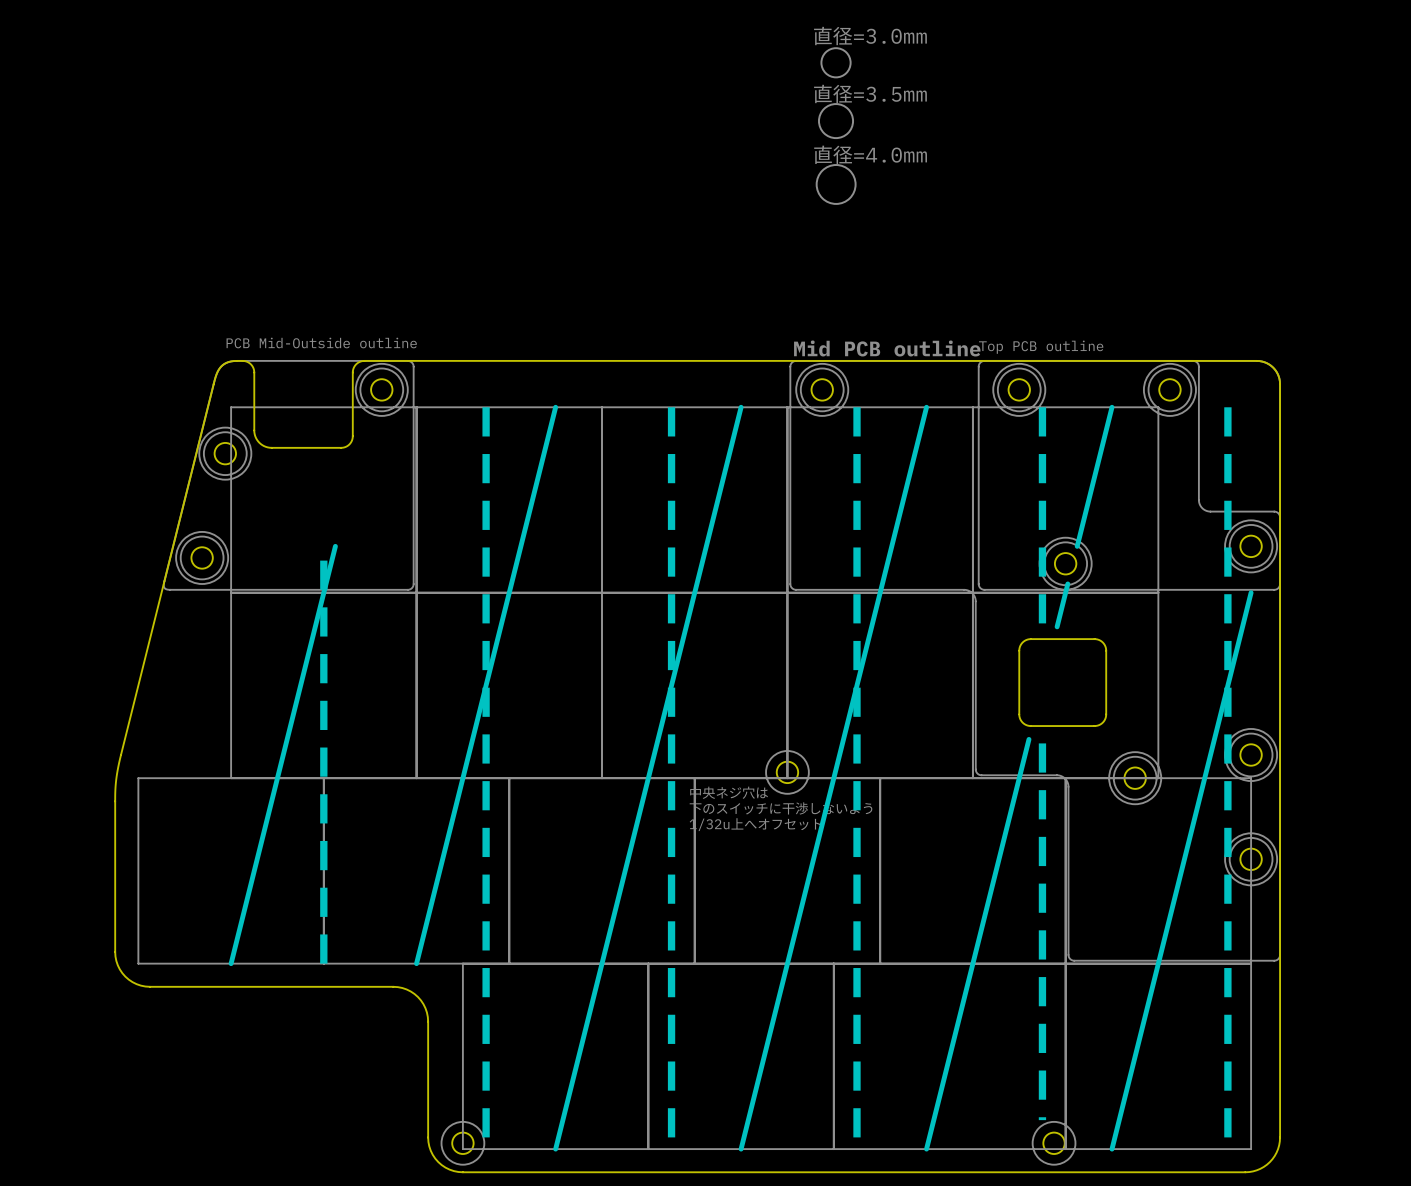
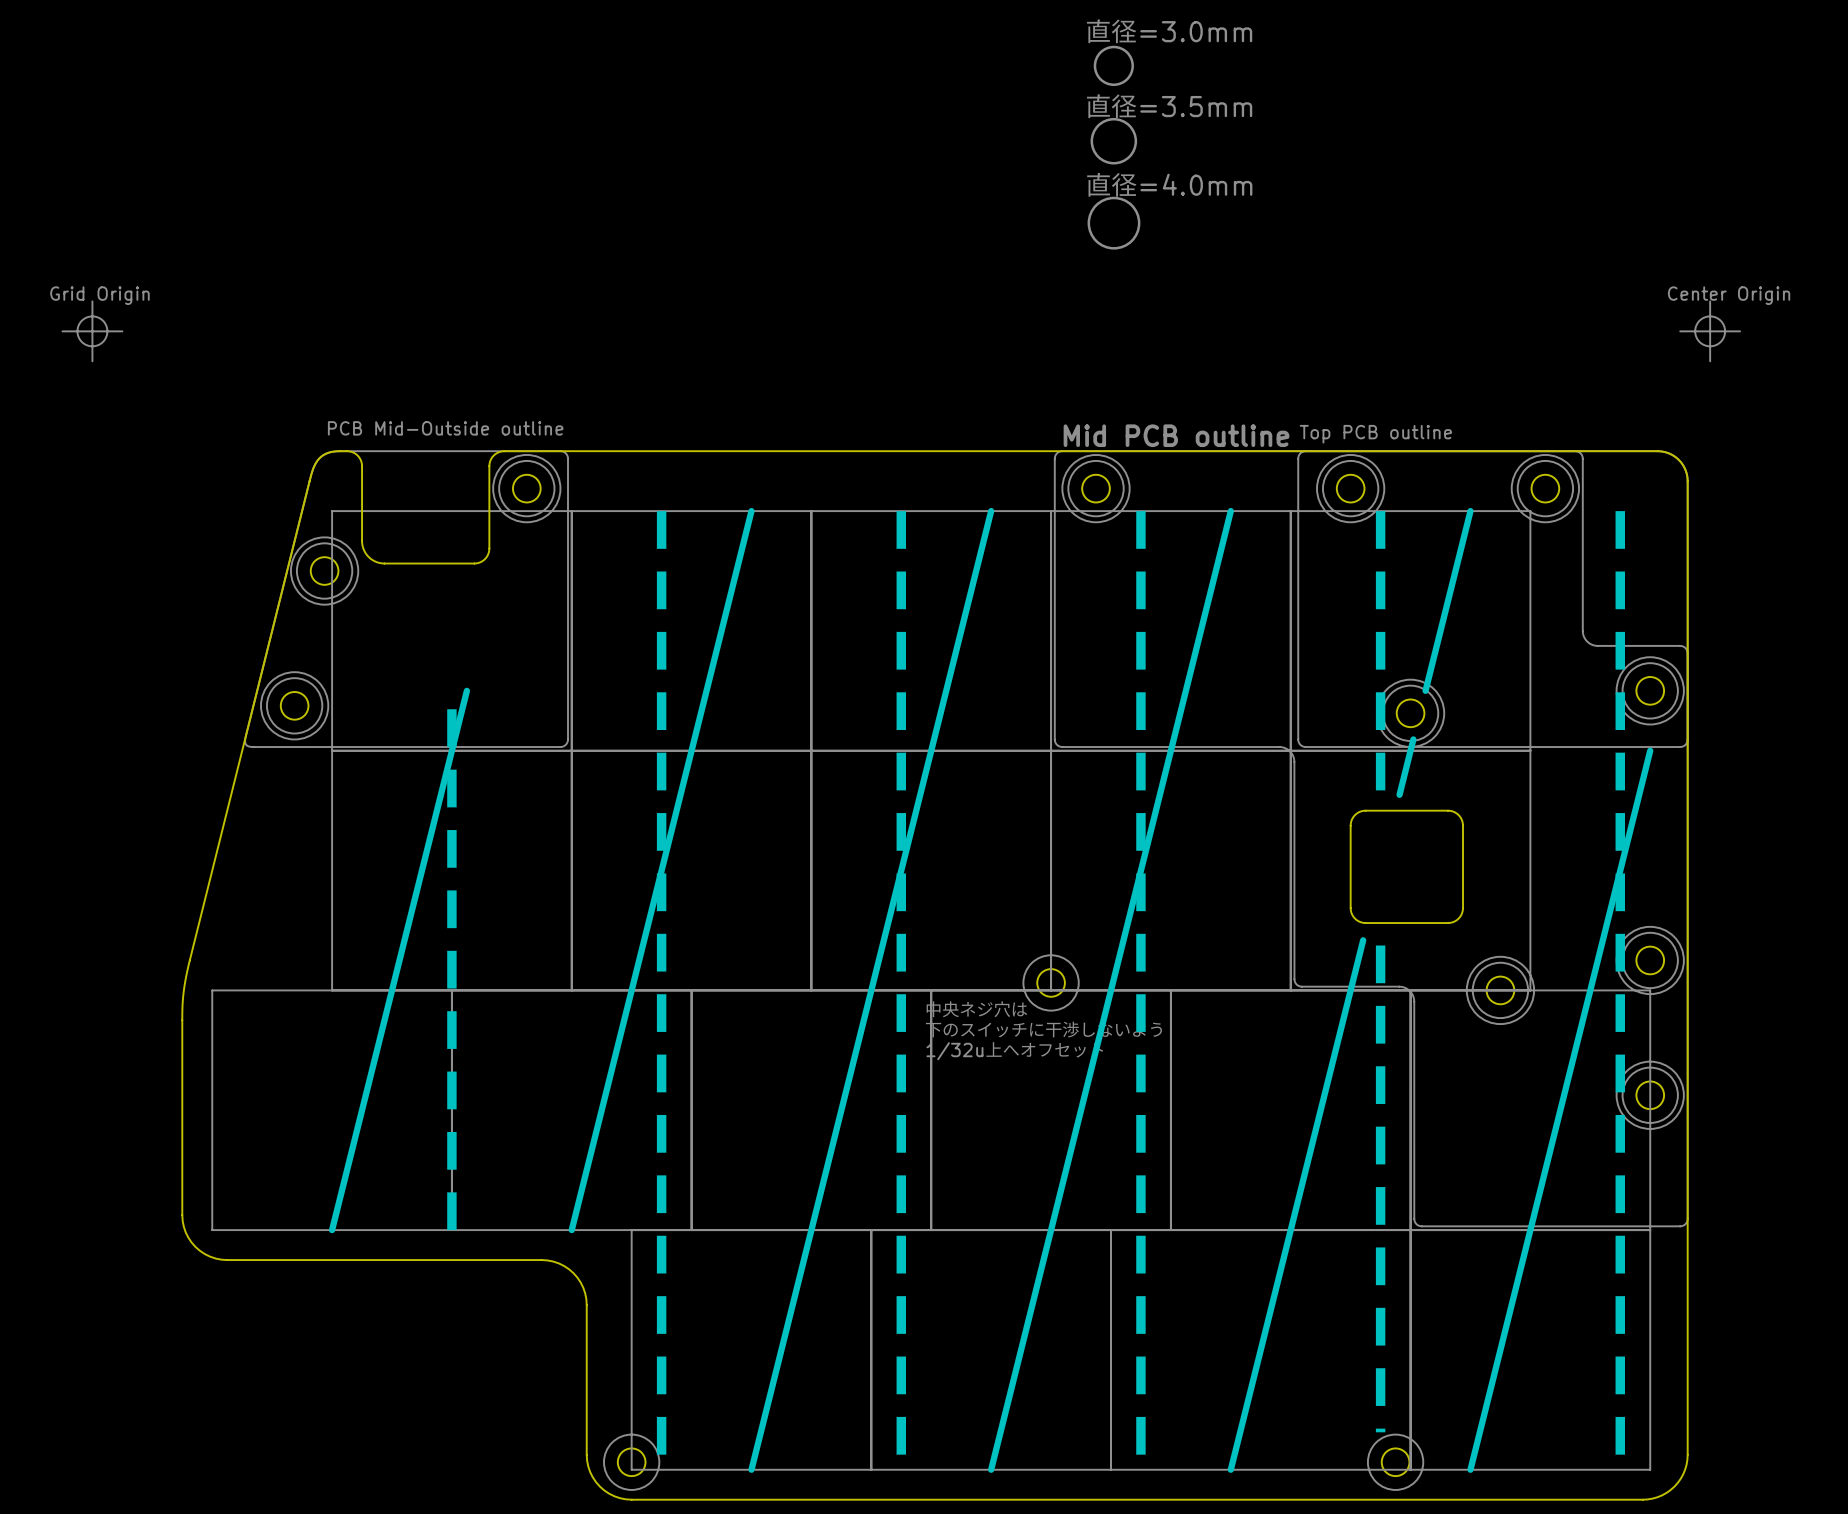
text: none -> Grid Origin (99, 295)
text: none -> Center Origin (1729, 295)
line: none -> (92, 301) (92, 361)
line: none -> (1710, 301) (1710, 361)
drawing: none -> [76, 315, 109, 347]
drawing: none -> [1694, 315, 1726, 347]
line: none -> (62, 331) (122, 331)
line: none -> (1680, 331) (1740, 331)

